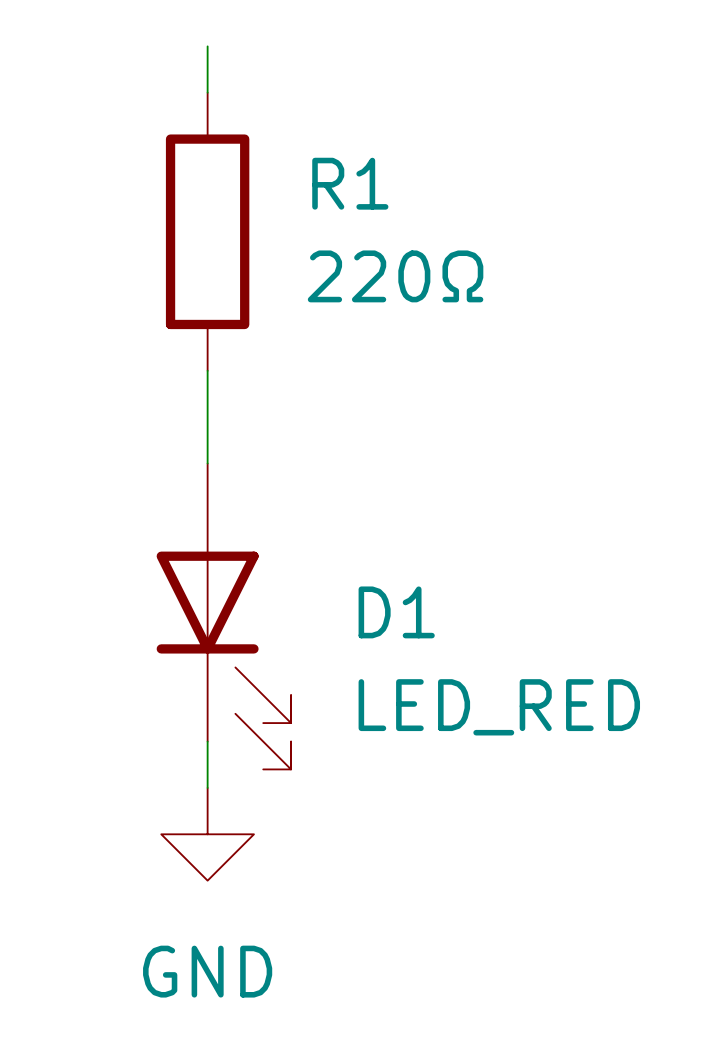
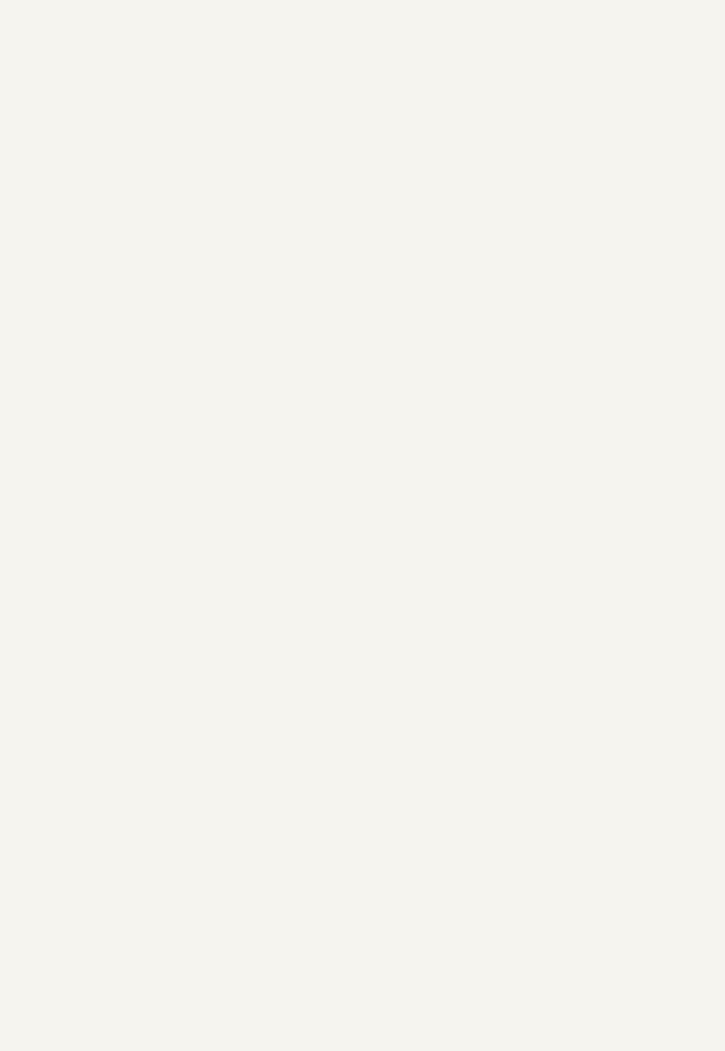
wire: (207, 46) (207, 92) -> none
R1: 220Ω (207, 231) -> none
wire: (207, 370) (207, 463) -> none
D1: LED_RED (223, 616) -> none
wire: (207, 741) (207, 787) -> none
power symbol: GND (207, 834) -> none

